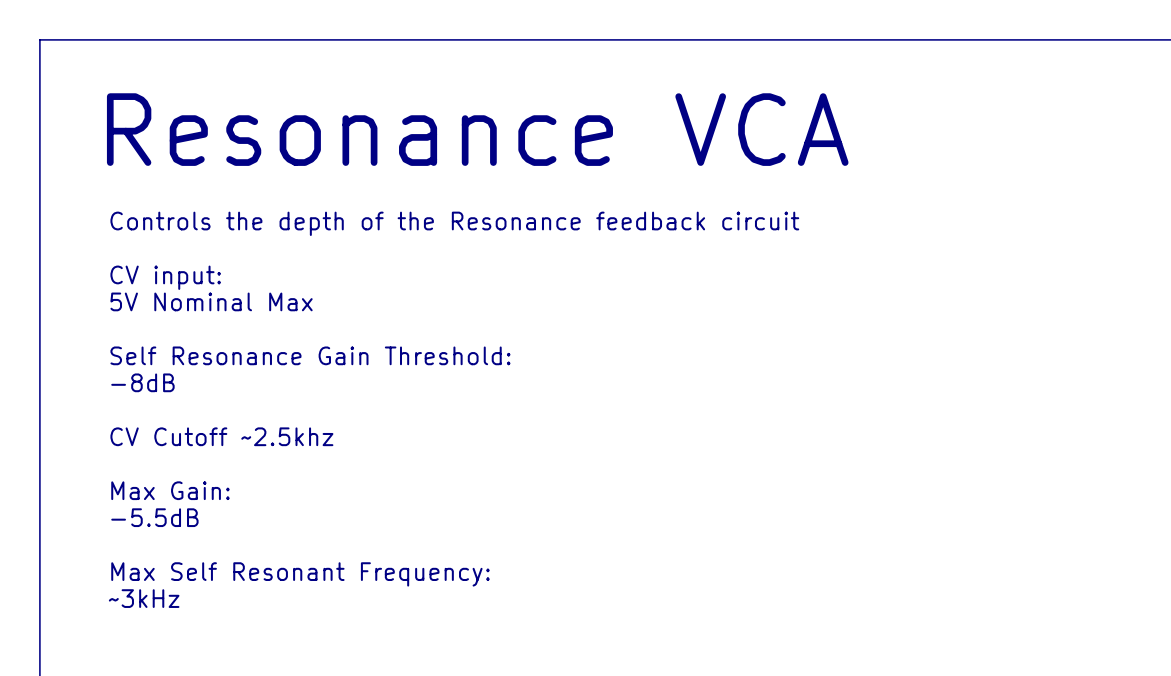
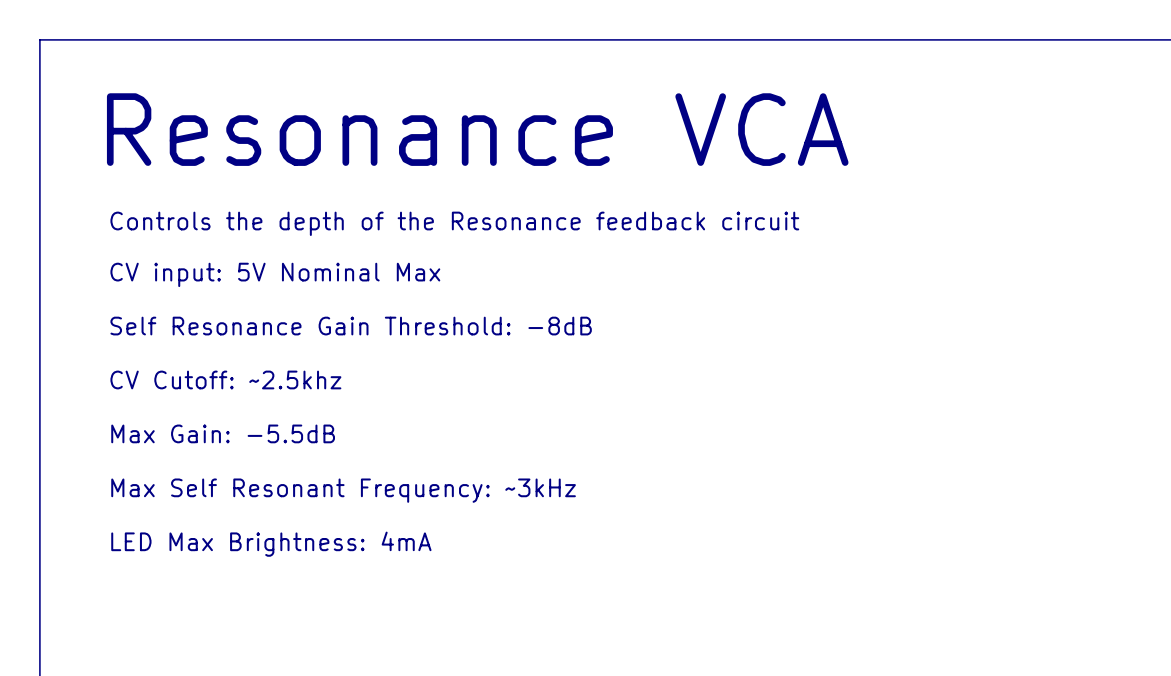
text: CV input: (165, 277) -> CV input: 5V Nominal Max (275, 274)
text: 5V Nominal Max (211, 301) -> none
text: Self Resonance Gain Threshold: (310, 355) -> Self Resonance Gain Threshold: -8dB (351, 326)
text: -8dB (142, 382) -> CV Cutoff: ~2.5khz (225, 379)
text: CV Cutoff ~2.5khz (221, 436) -> Max Gain: -5.5dB (223, 433)
text: Max Gain: (170, 490) -> Max Self Resonant Frequency: ~3kHz (343, 490)
text: -5.5dB (154, 517) -> none
text: none -> LED Max Brightness: 4mA (271, 544)
text: Max Self Resonant Frequency: (300, 574) -> none
text: ~3kHz (144, 598) -> none

